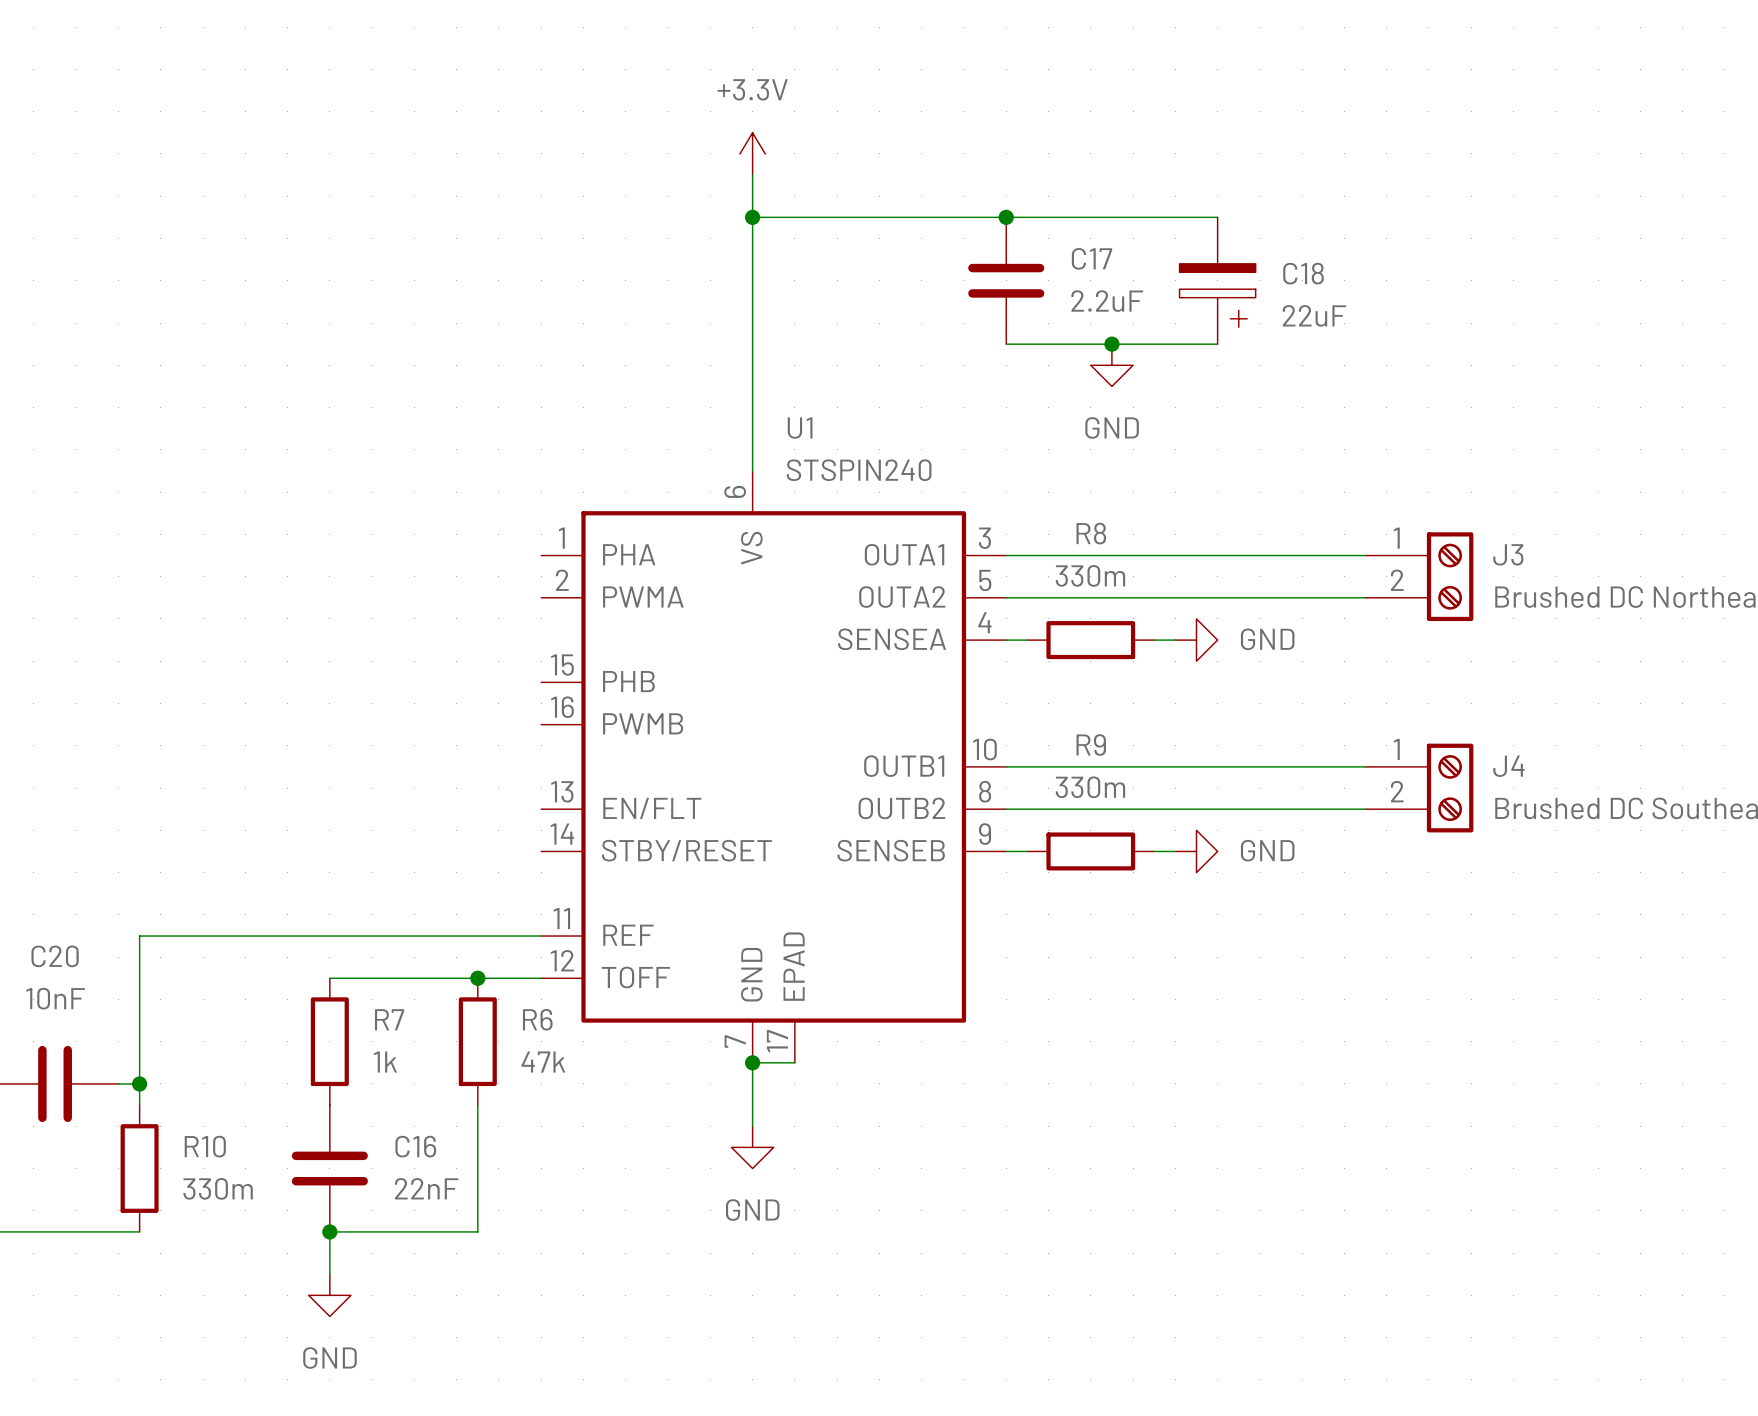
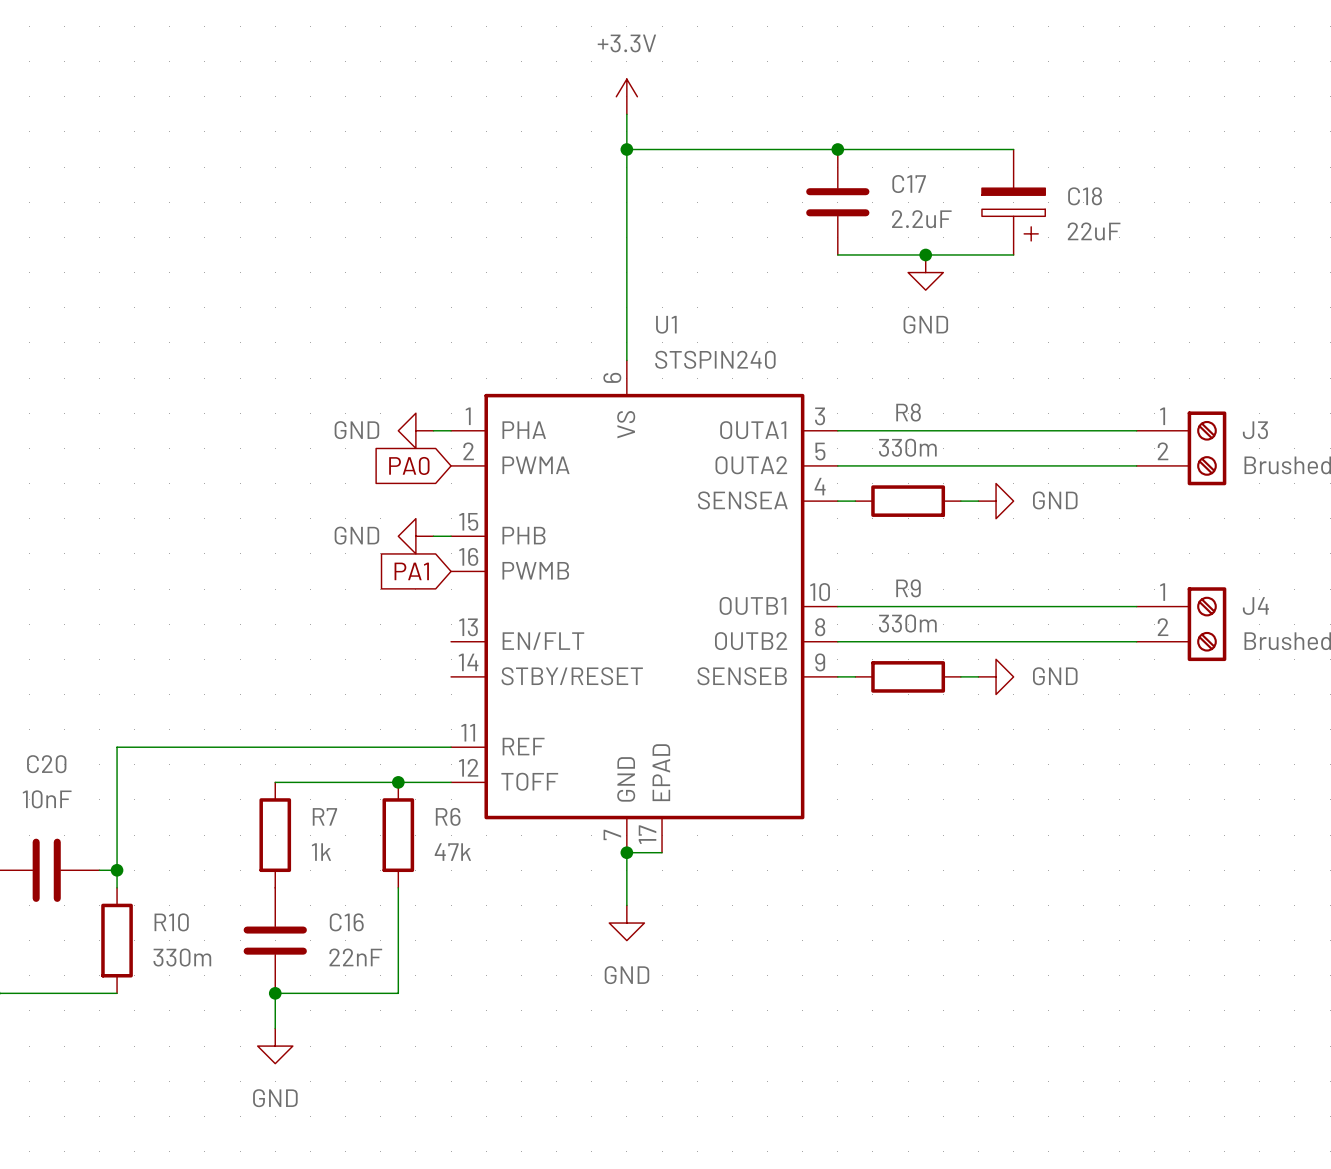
power symbol: none -> GND (415, 430)
wire: none -> (433, 430) (451, 430)
global label: none -> PA0 (409, 465)
power symbol: none -> GND (415, 536)
wire: none -> (433, 536) (451, 536)
global label: none -> PA1 (411, 571)

